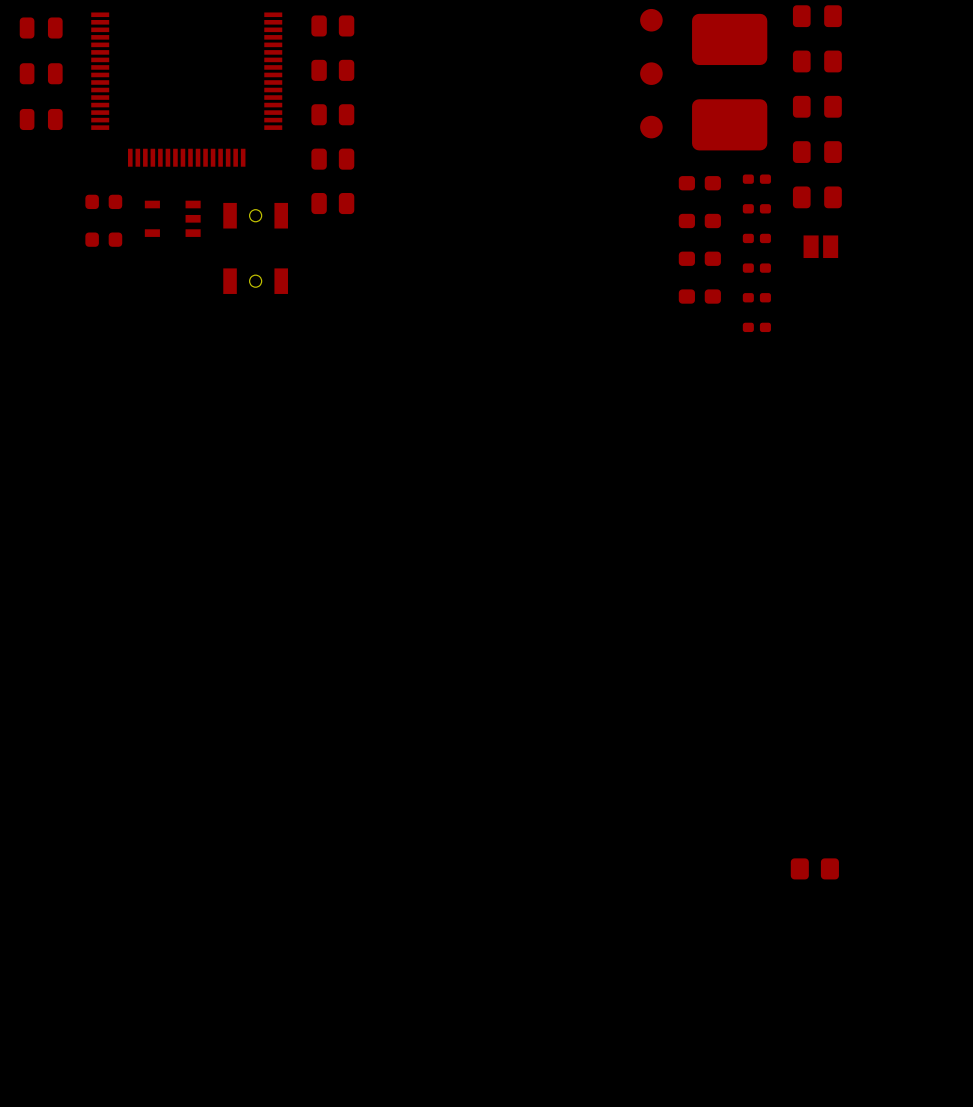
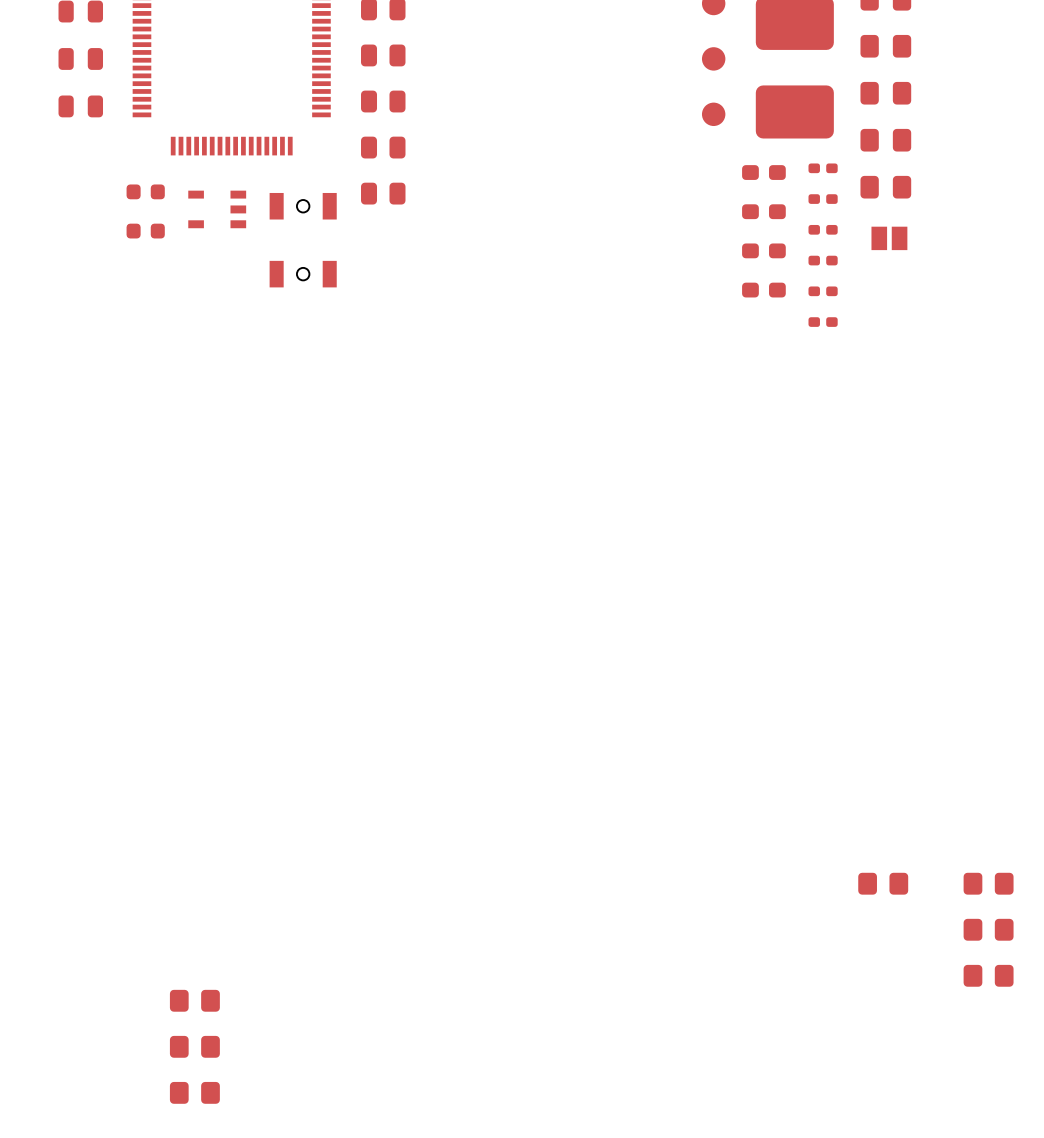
part: none -> (988, 883)
part: none -> (988, 929)
part: none -> (988, 975)
part: none -> (194, 1000)
part: none -> (194, 1046)
part: none -> (194, 1092)

